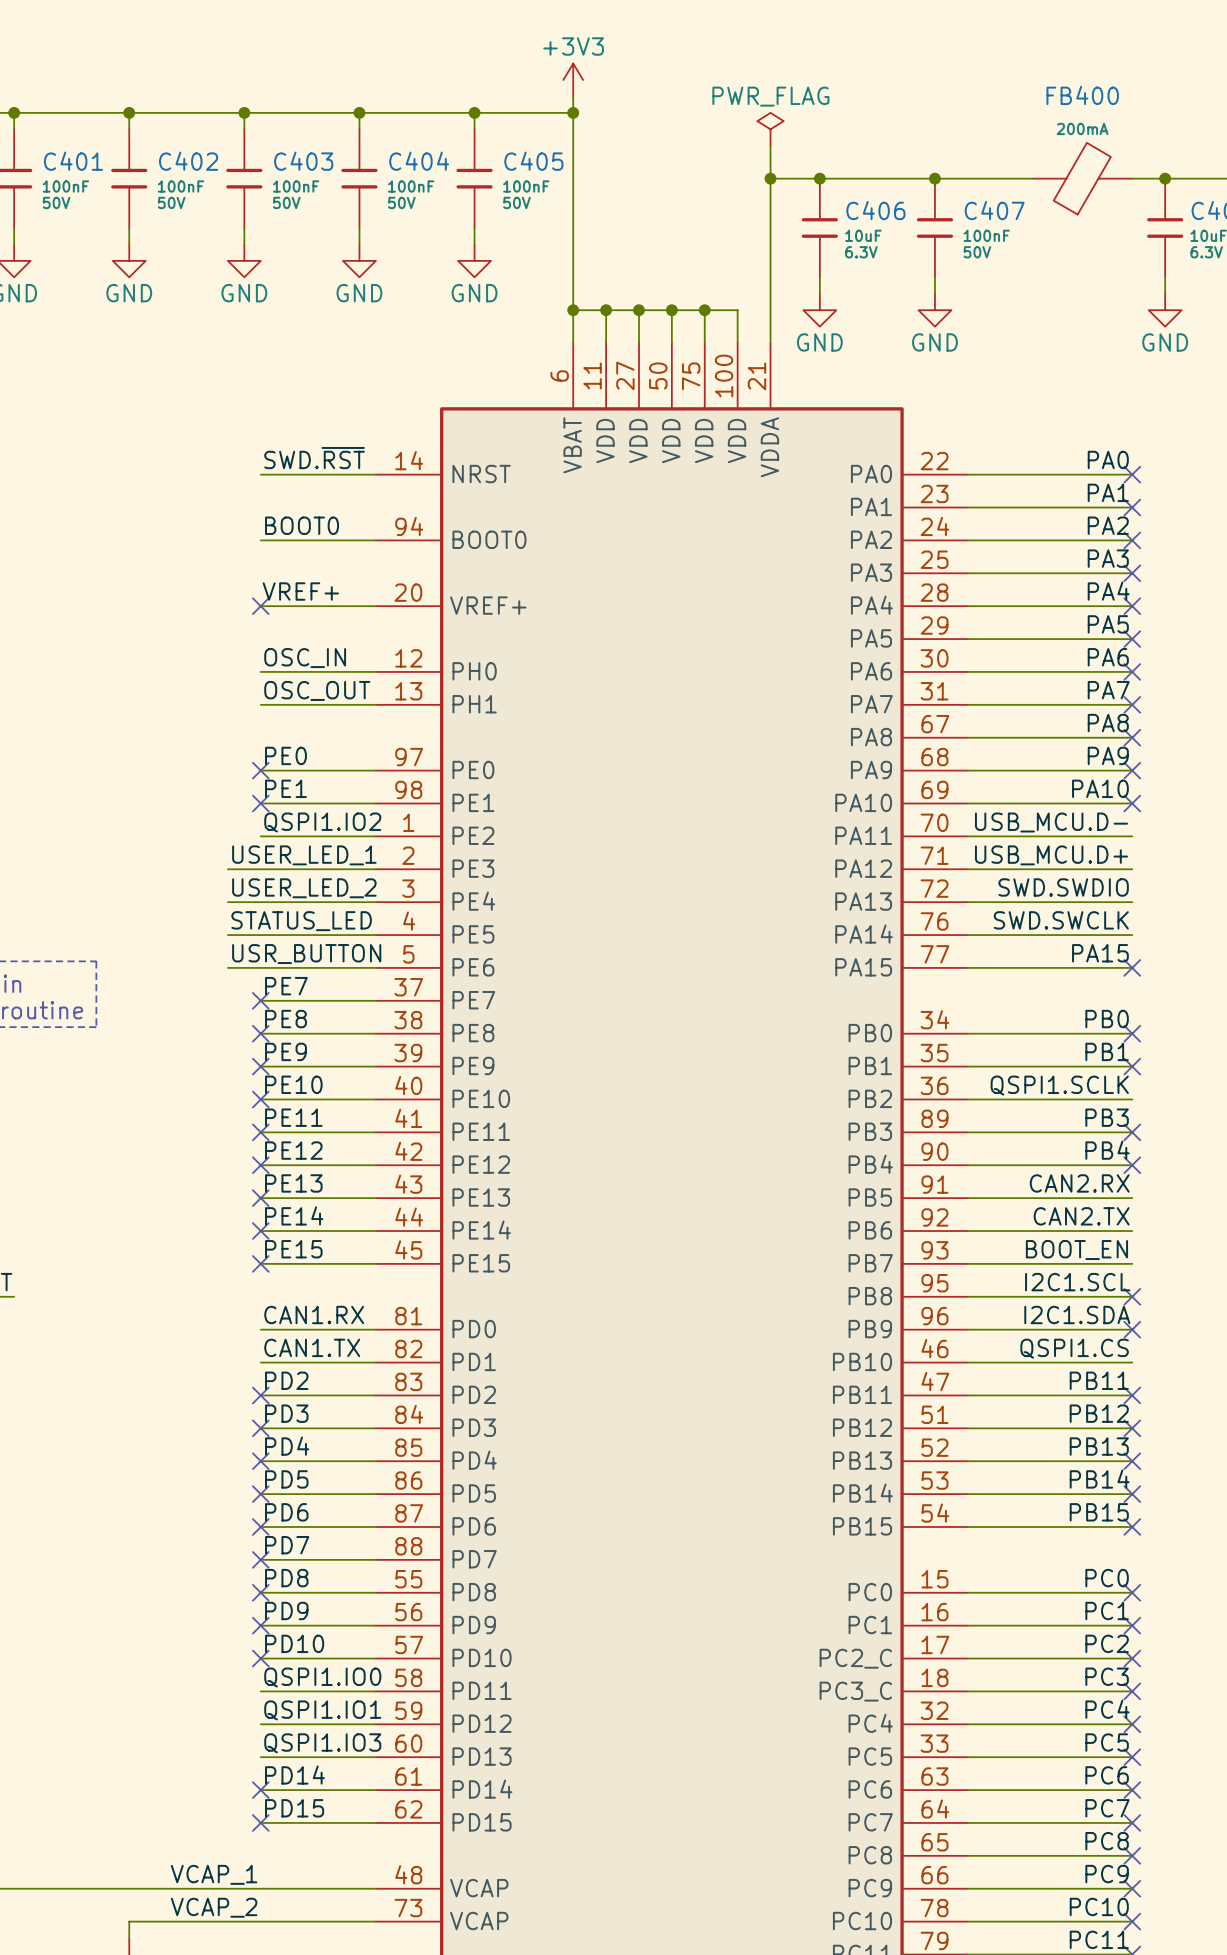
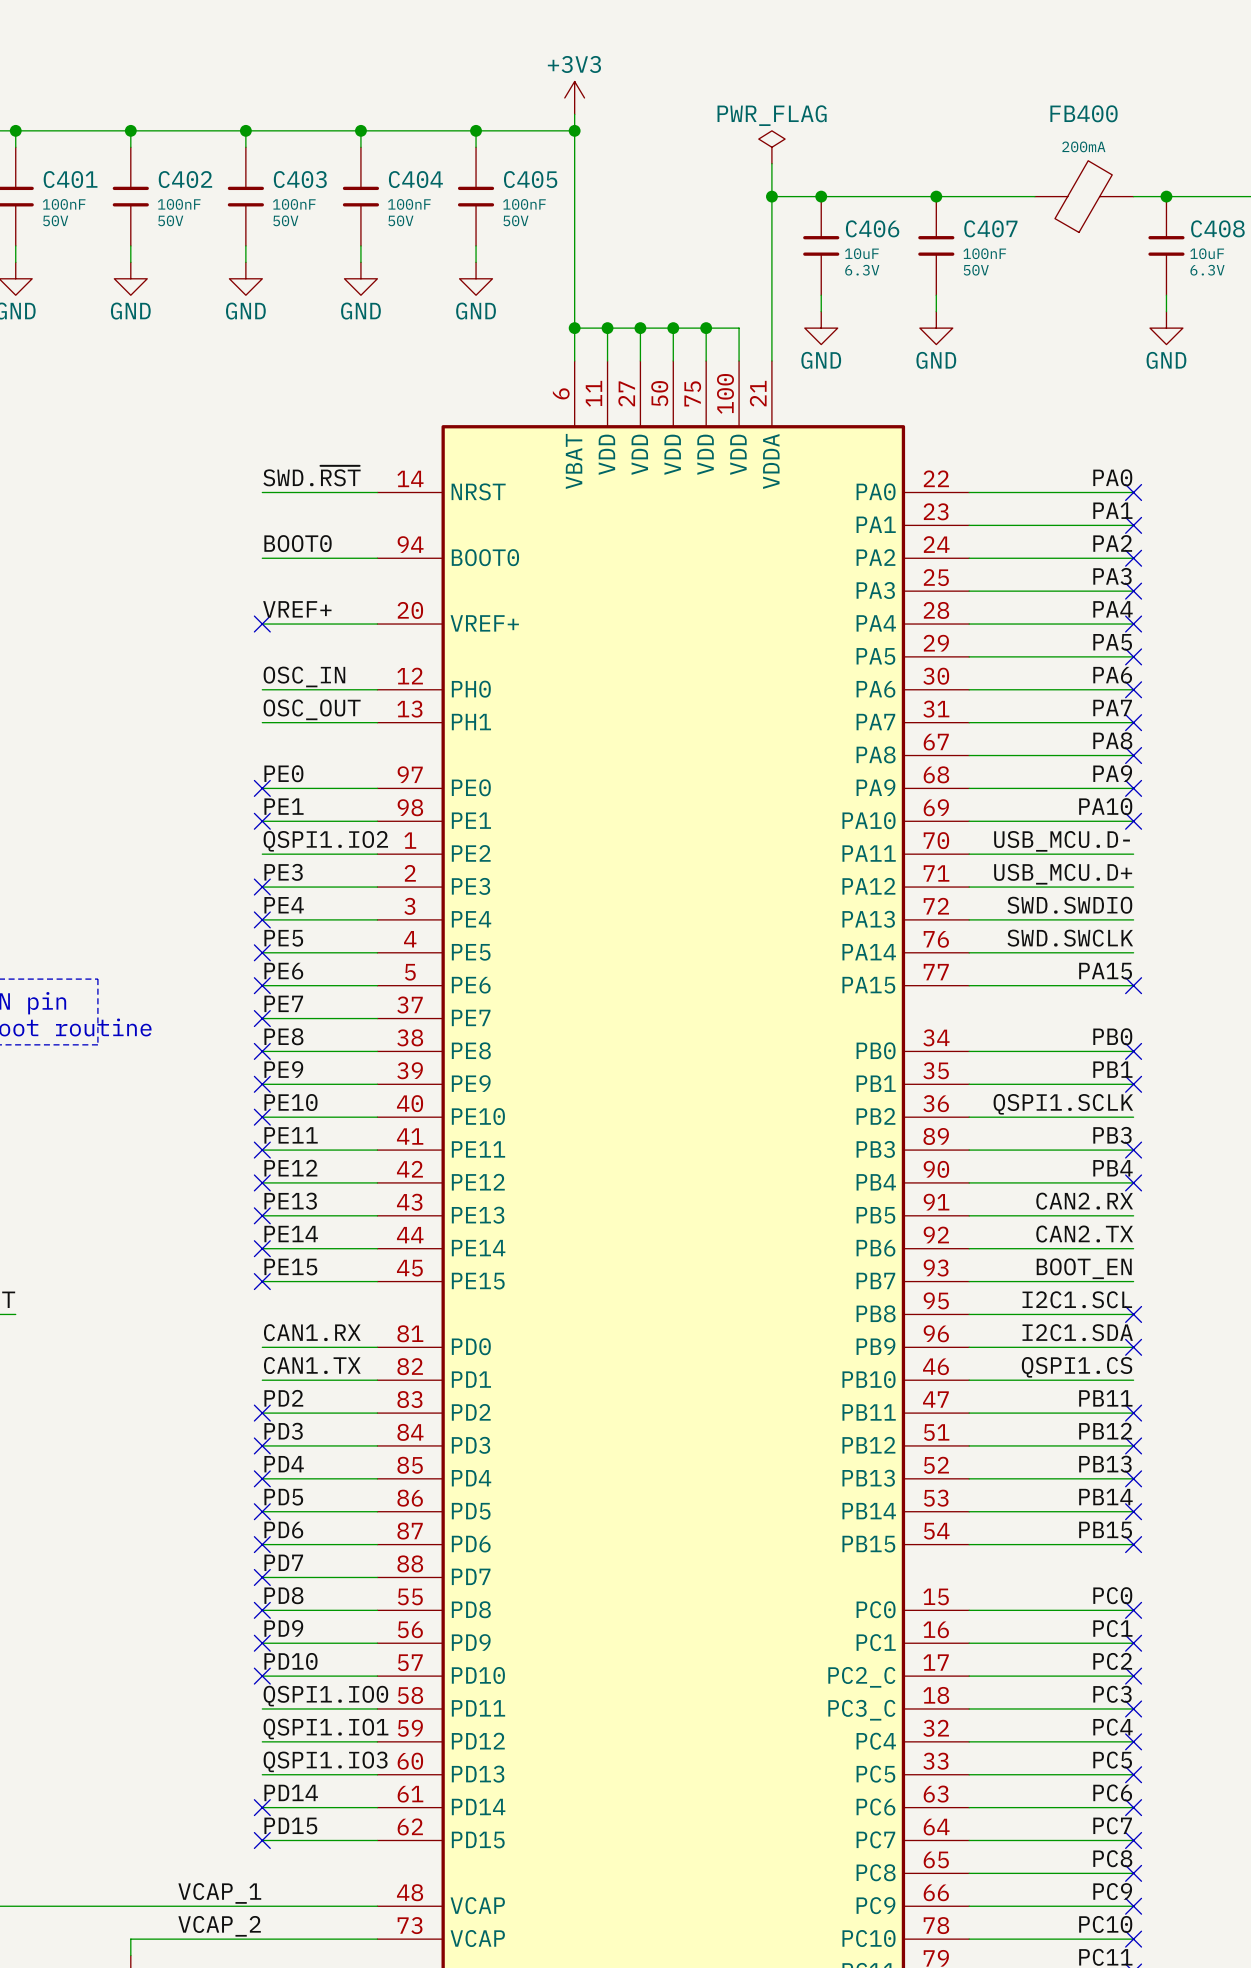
label: none -> PE3 (283, 872)
label: USER_LED_1 (304, 855) -> none
wire: (227, 869) (260, 869) -> none
no-connect mark: none -> (262, 887)
label: none -> PE4 (284, 905)
label: USER_LED_2 (304, 888) -> none
wire: (227, 902) (260, 902) -> none
no-connect mark: none -> (262, 919)
label: none -> PE5 (283, 938)
label: STATUS_LED (301, 921) -> none
wire: (227, 935) (260, 935) -> none
no-connect mark: none -> (262, 952)
label: none -> PE6 (283, 971)
label: USR_BUTTON (306, 954) -> none
wire: (227, 967) (260, 967) -> none
no-connect mark: none -> (262, 985)

